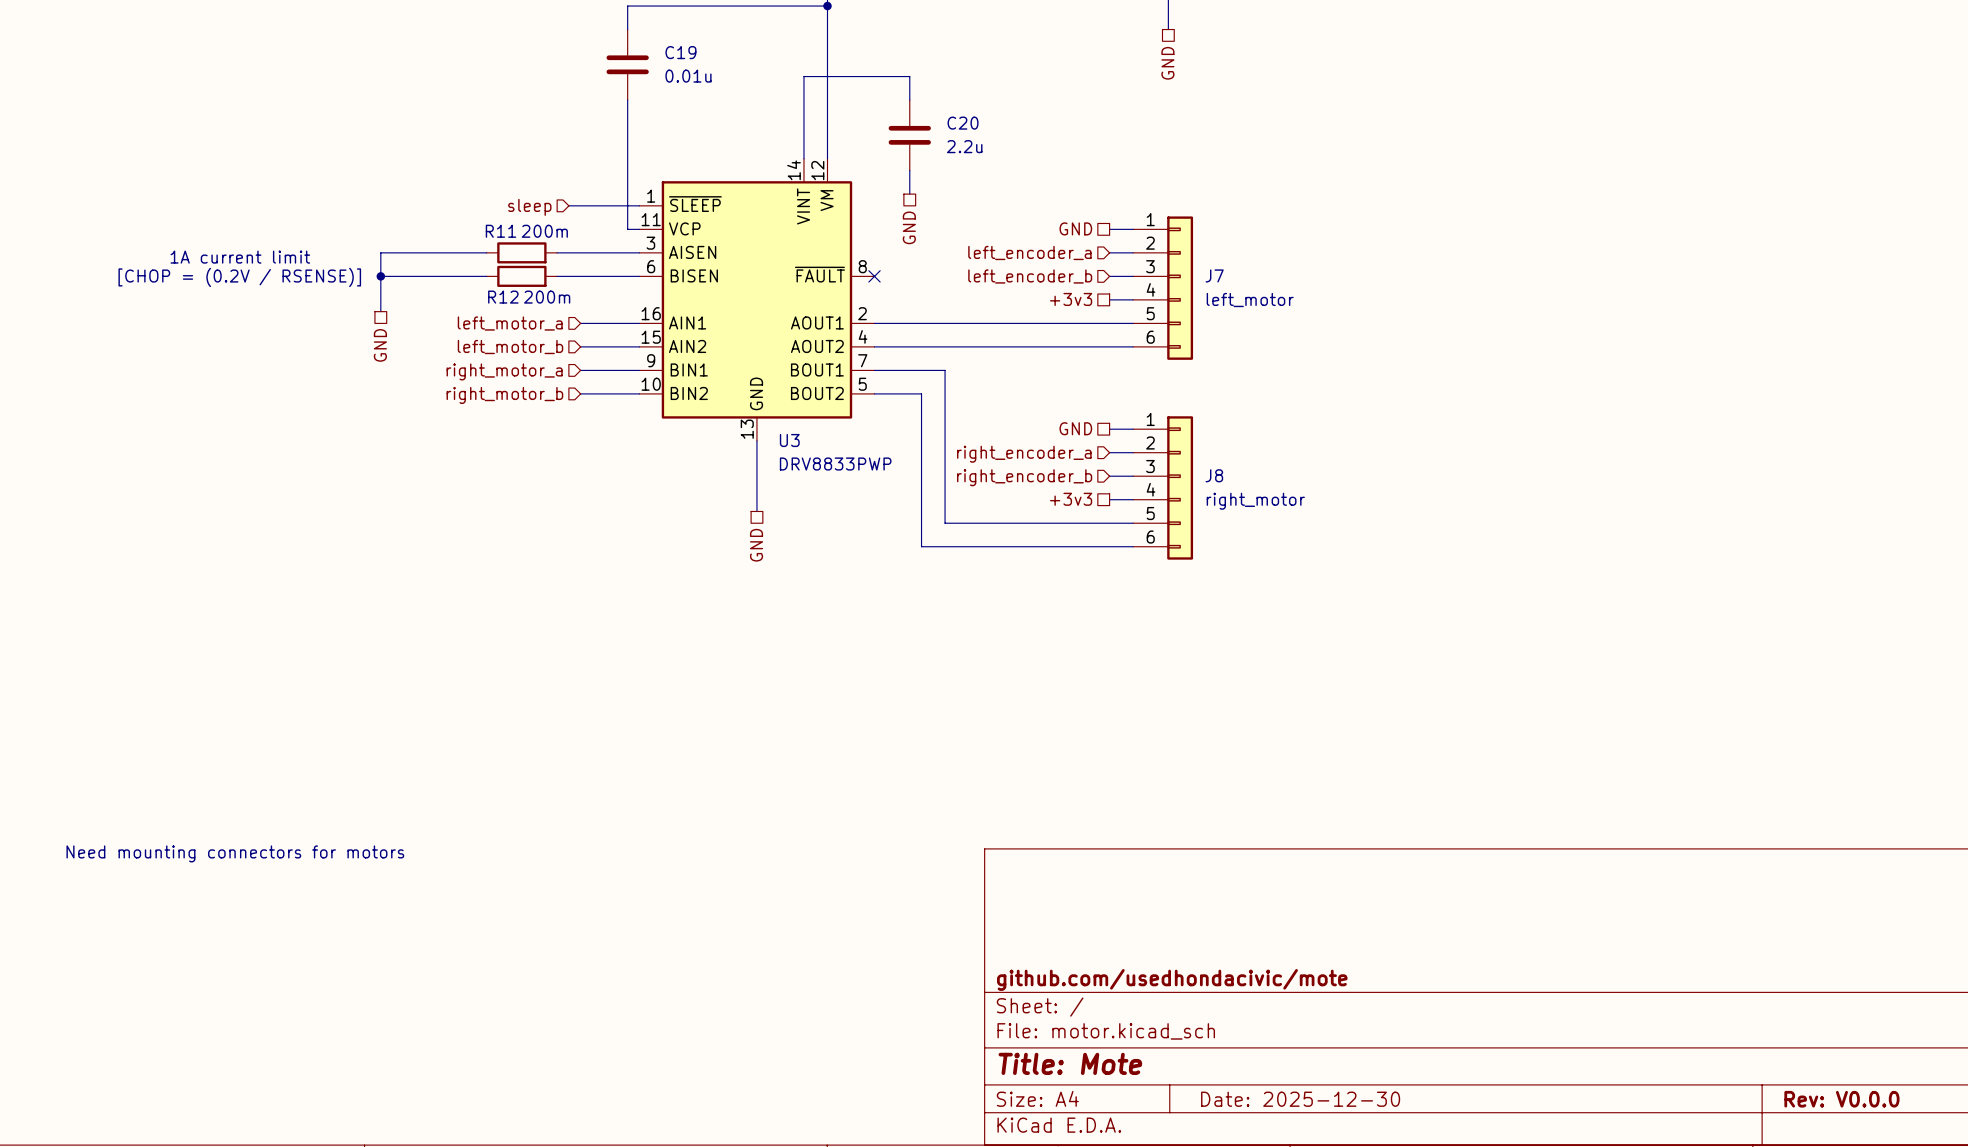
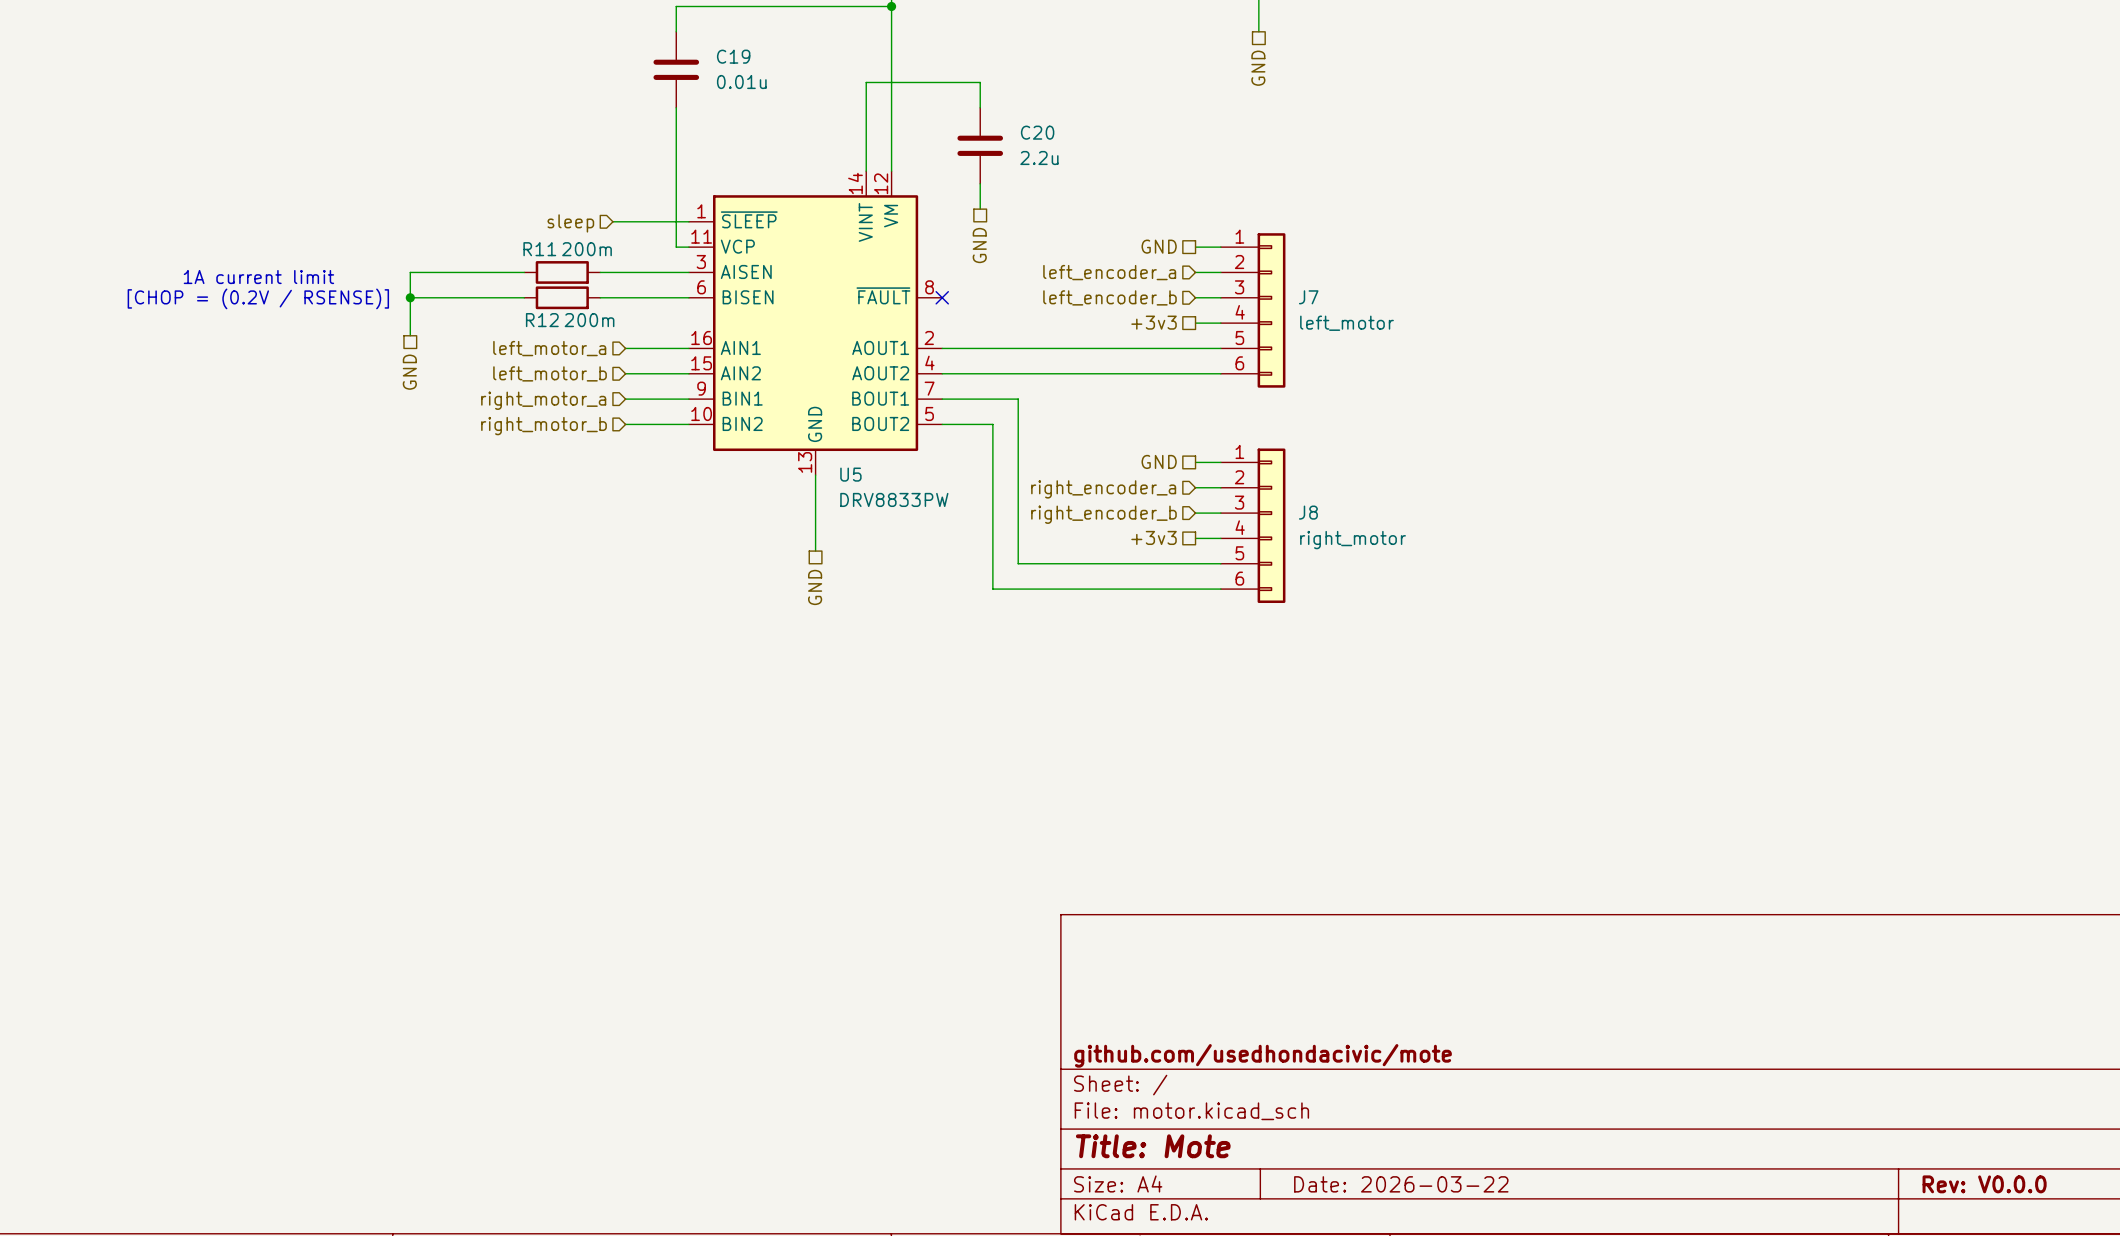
U3 name: U3 (789, 440) -> U5 (850, 474)
U3 value: DRV8833PWP (835, 464) -> DRV8833PW (894, 499)
text: Need mounting connectors for motors (235, 853) -> none
title block: Date: 2025-12-30 (1300, 1099) -> Date: 2026-03-22 (1401, 1184)

